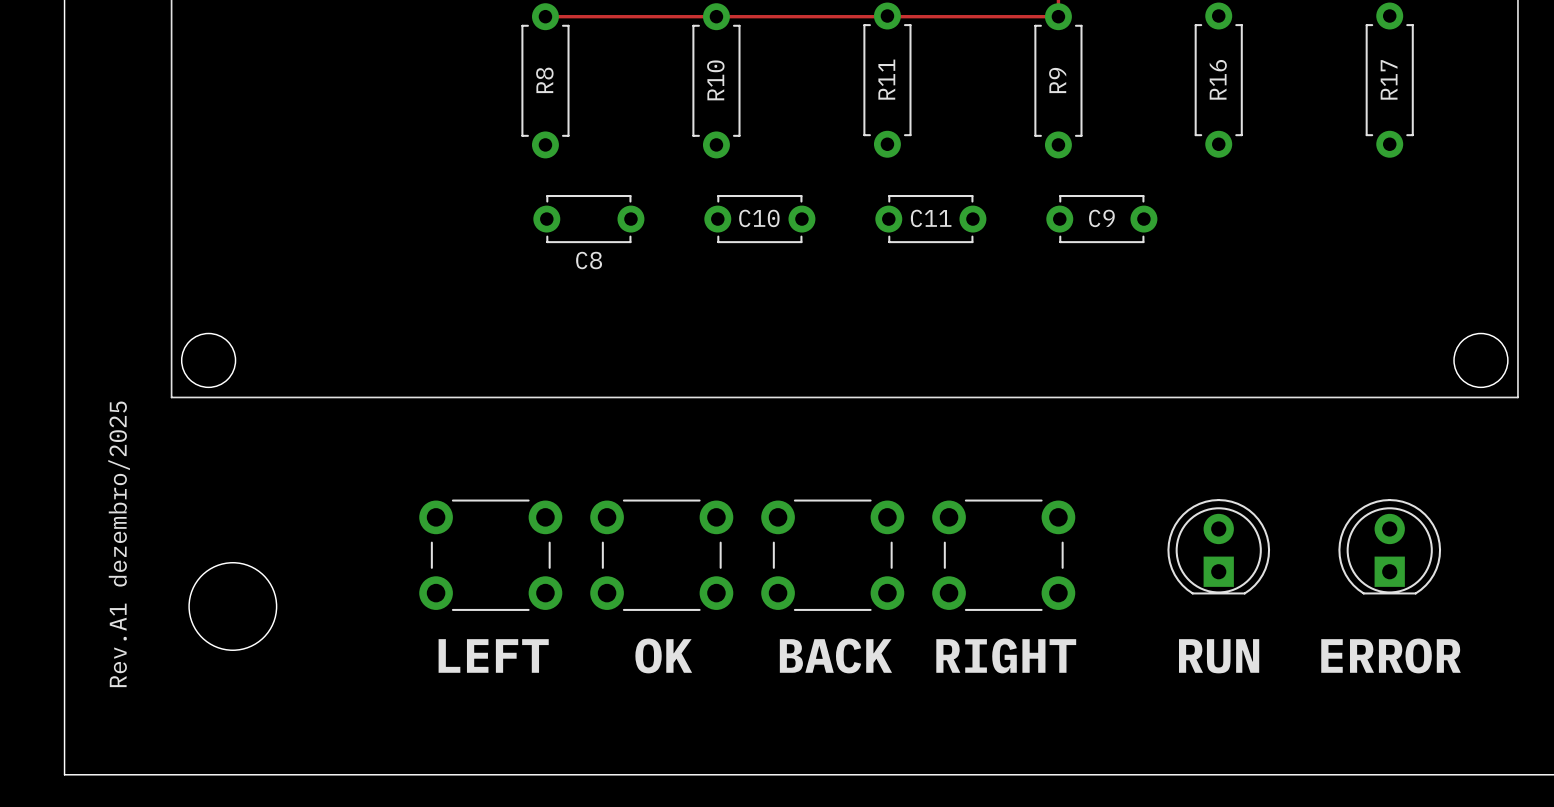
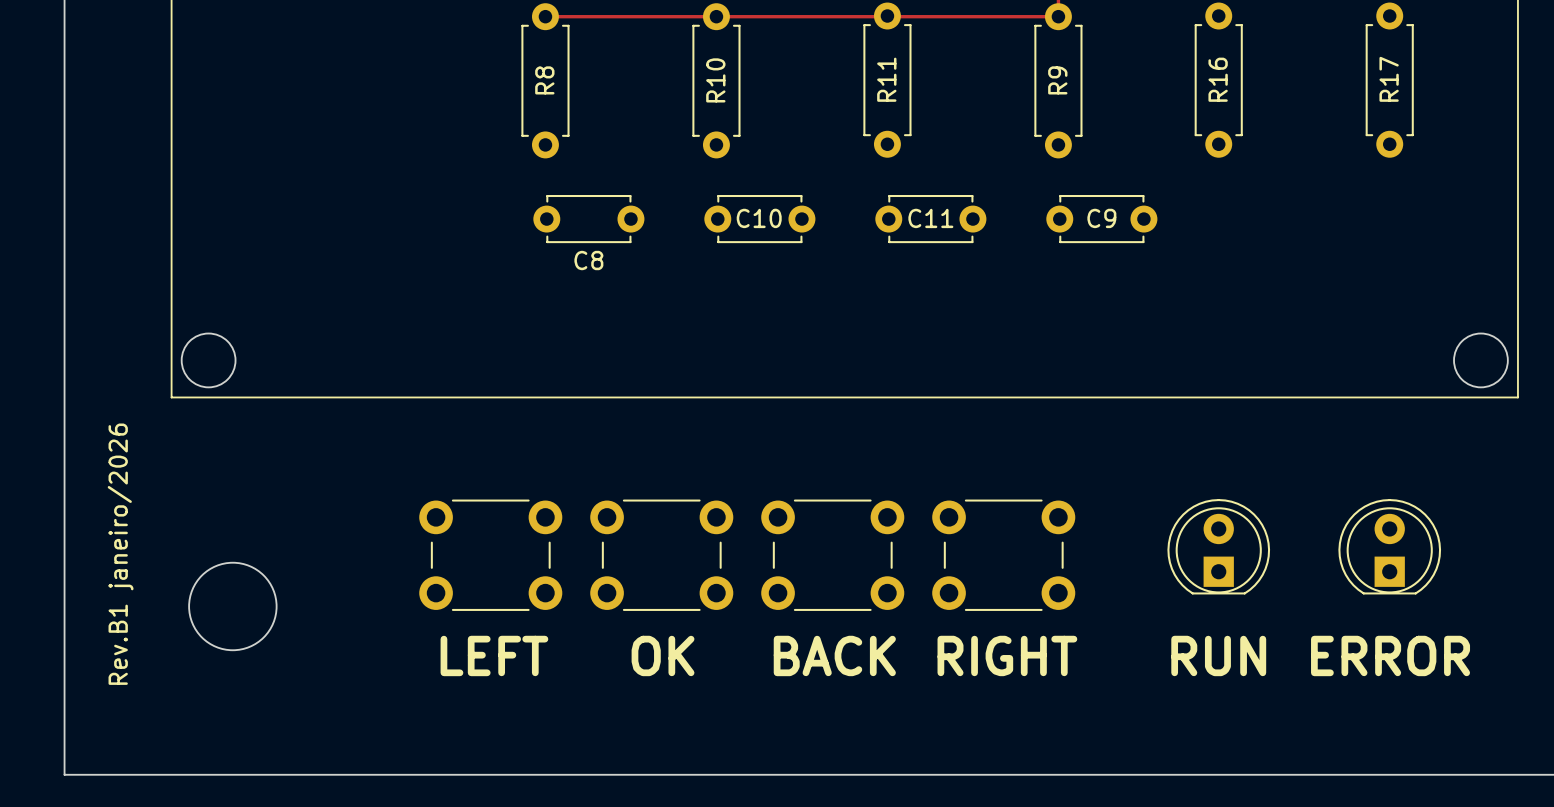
text: Rev.A1 dezembro/2025 (119, 544) -> Rev.B1 janeiro/2026 (120, 554)

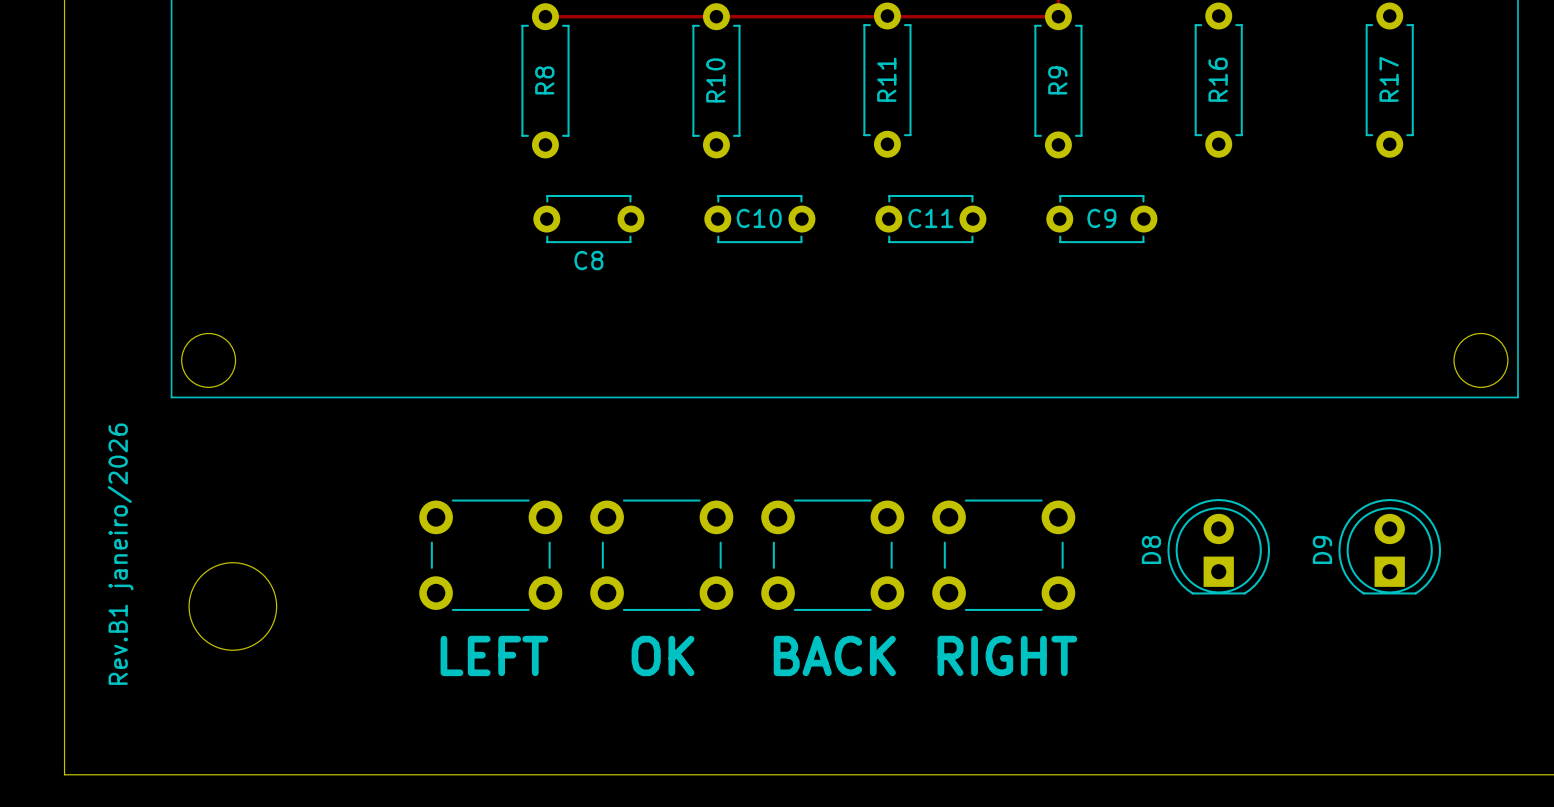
D8 name: none -> D8 (1151, 549)
D9 name: none -> D9 (1322, 549)
D8 value: RUN (1218, 655) -> none
D9 value: ERROR (1390, 655) -> none

